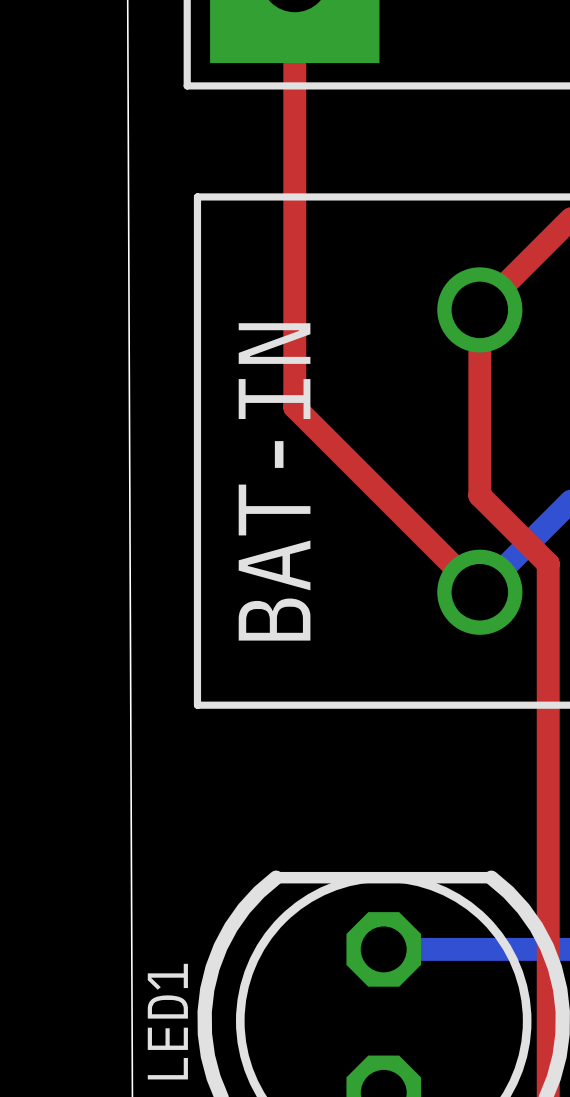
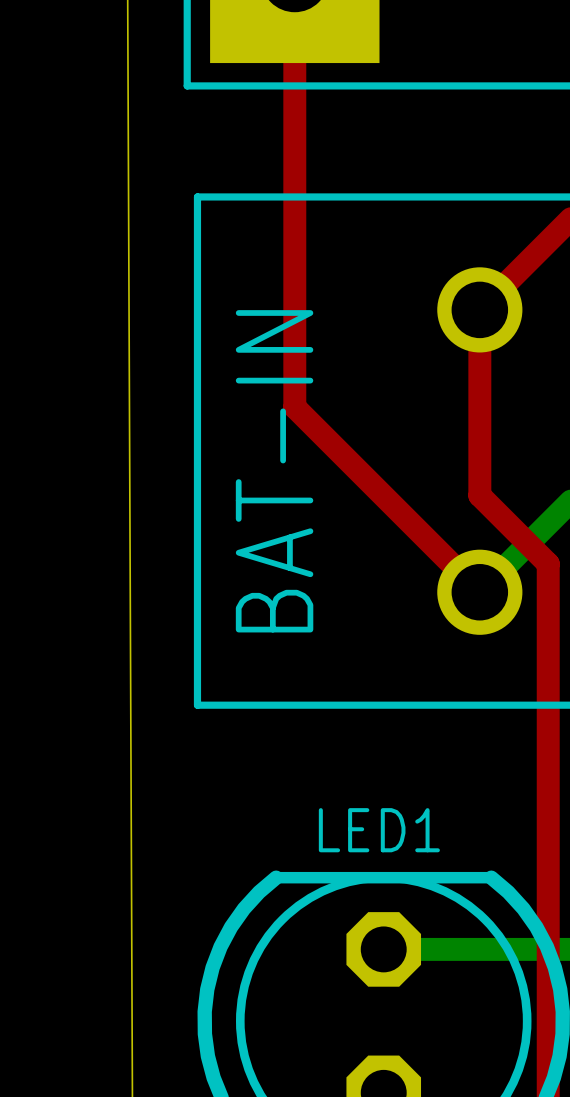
LED1 name rotation: 0° (167, 1021) -> 90° clockwise (379, 830)
LED1 name position: LED1 (167, 1021) -> LED1 (379, 830)

